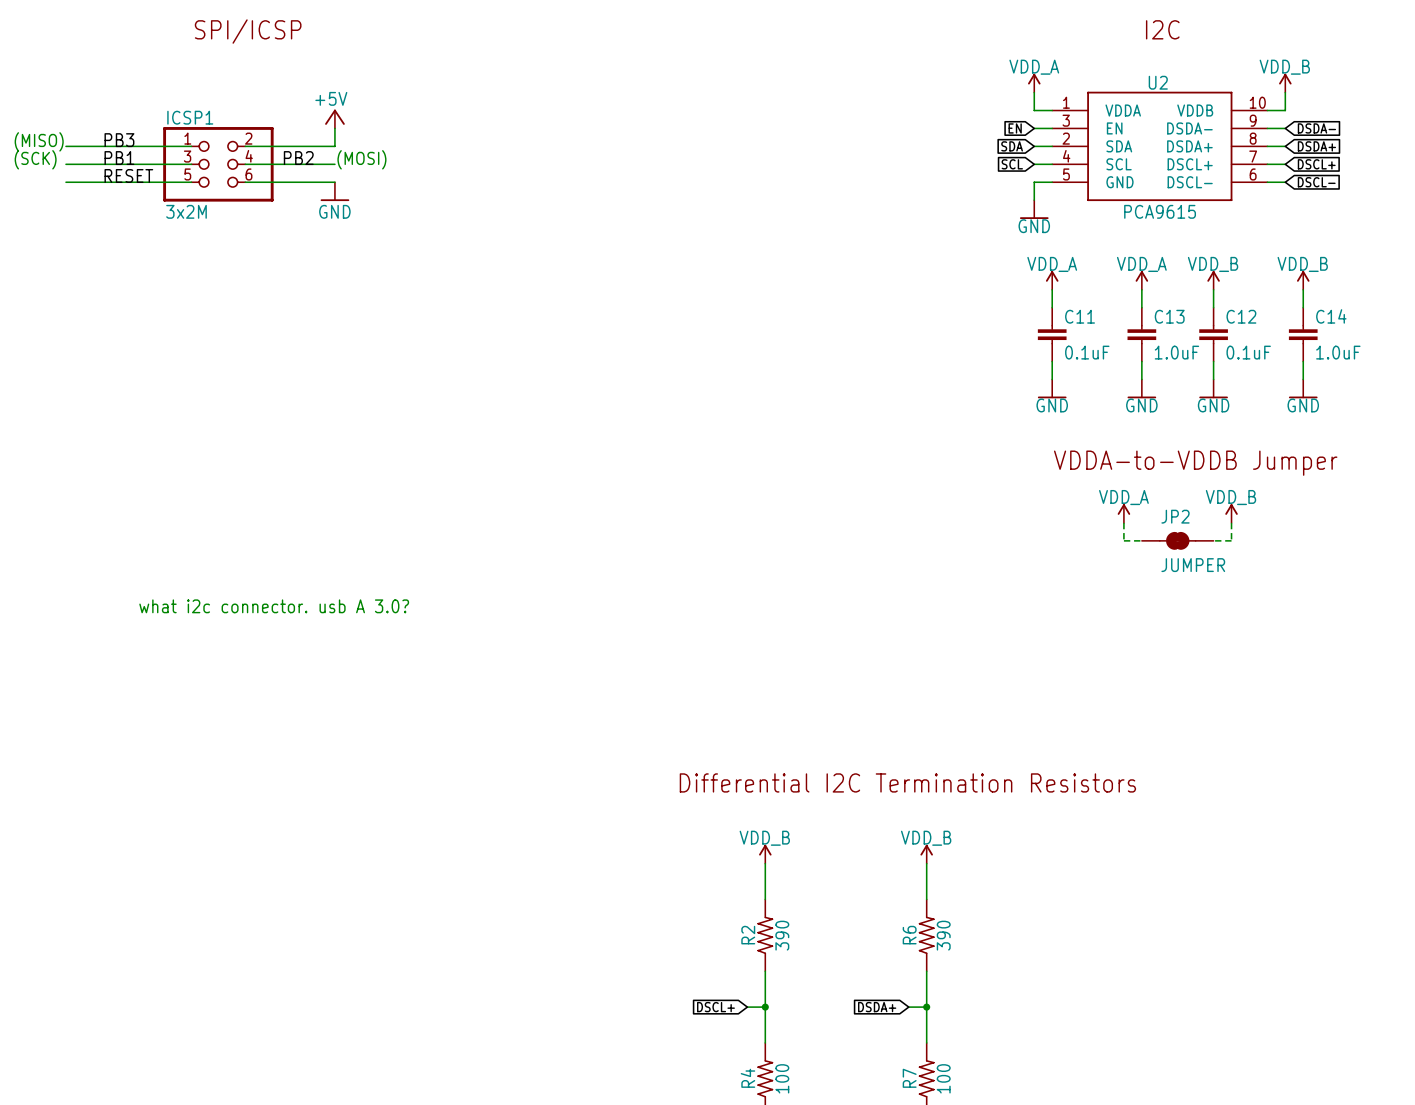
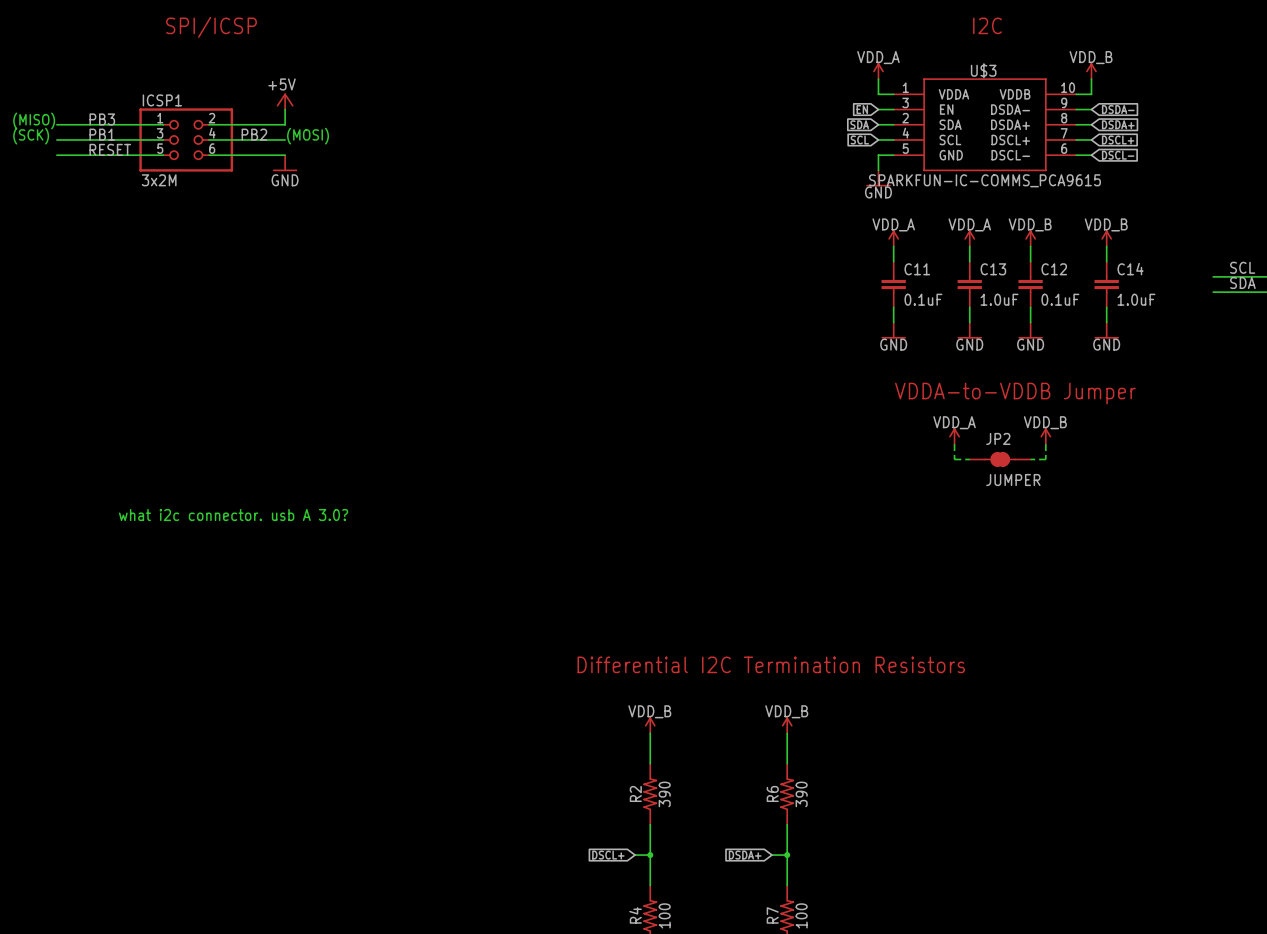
U2 name: U2 (1158, 82) -> U$3 (983, 70)
U2 value: PCA9615 (1160, 211) -> SPARKFUN-IC-COMMS_PCA9615 (984, 180)

